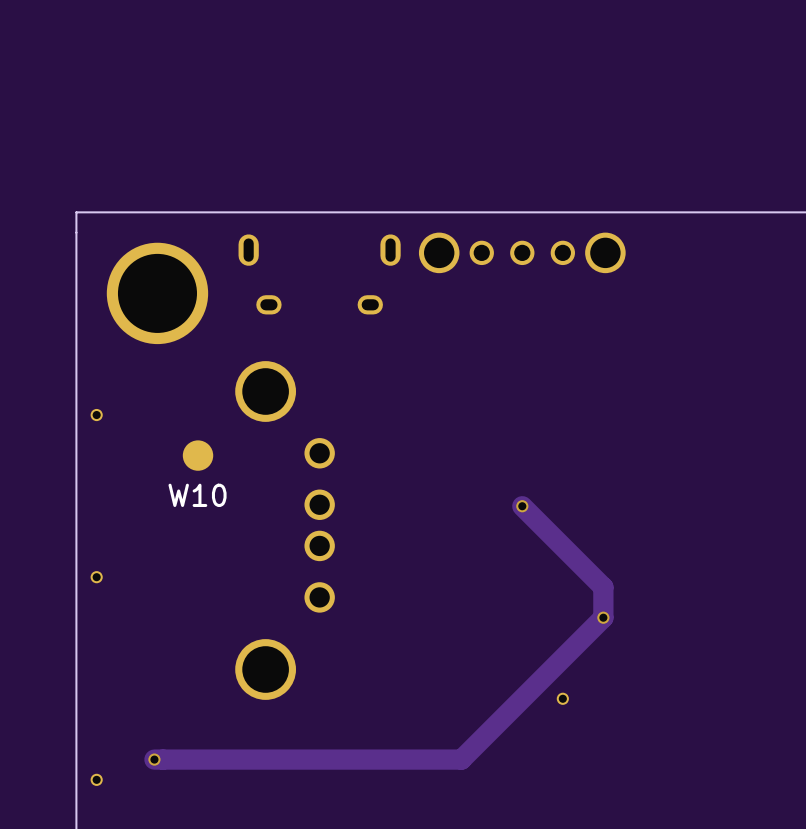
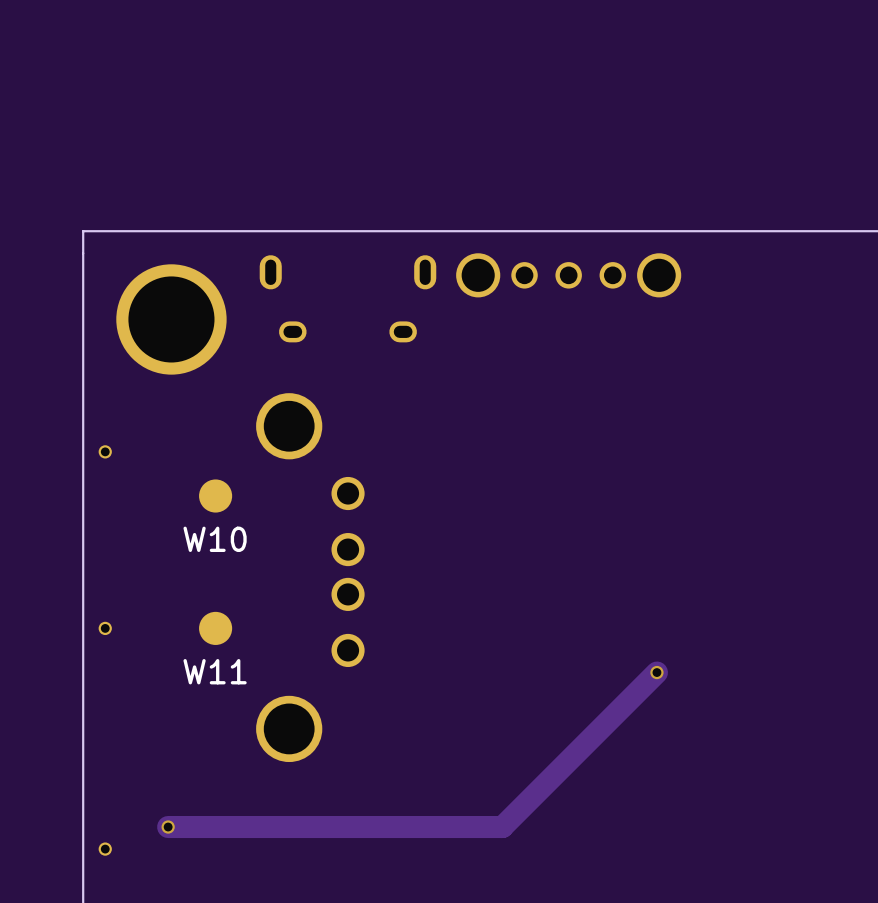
track: (522, 506) (603, 587) (603, 617) -> none
via: (522, 506) -> none
W11: none -> (215, 628)
part: (562, 698) -> none

